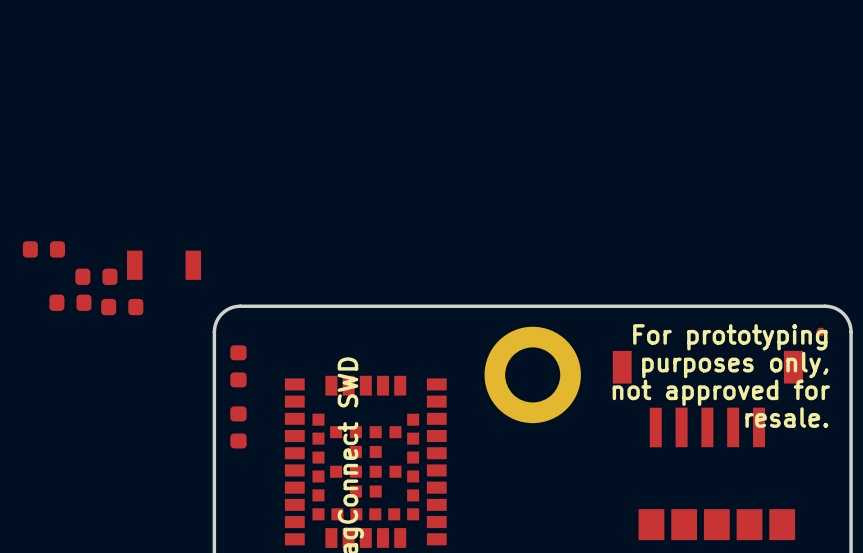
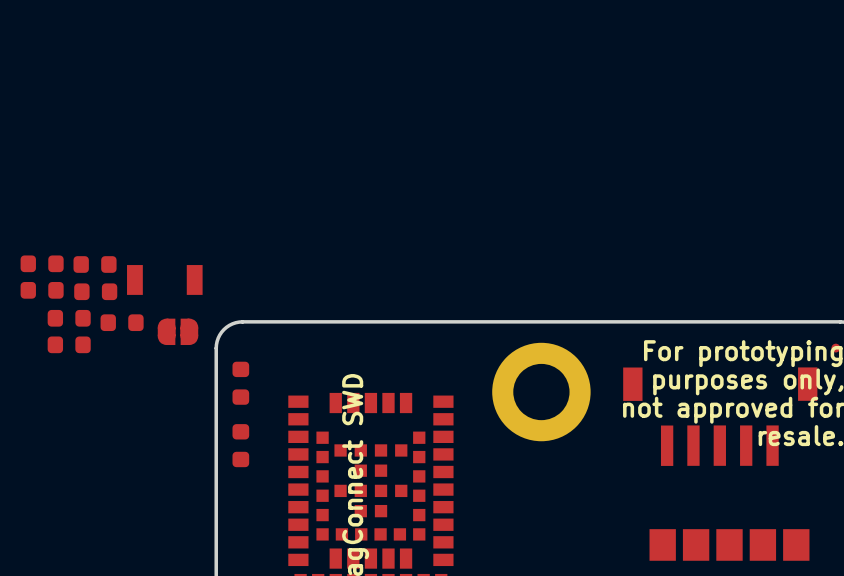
part: none -> (95, 264)
part: none -> (42, 290)
part: none -> (177, 331)
part: none -> (69, 344)

